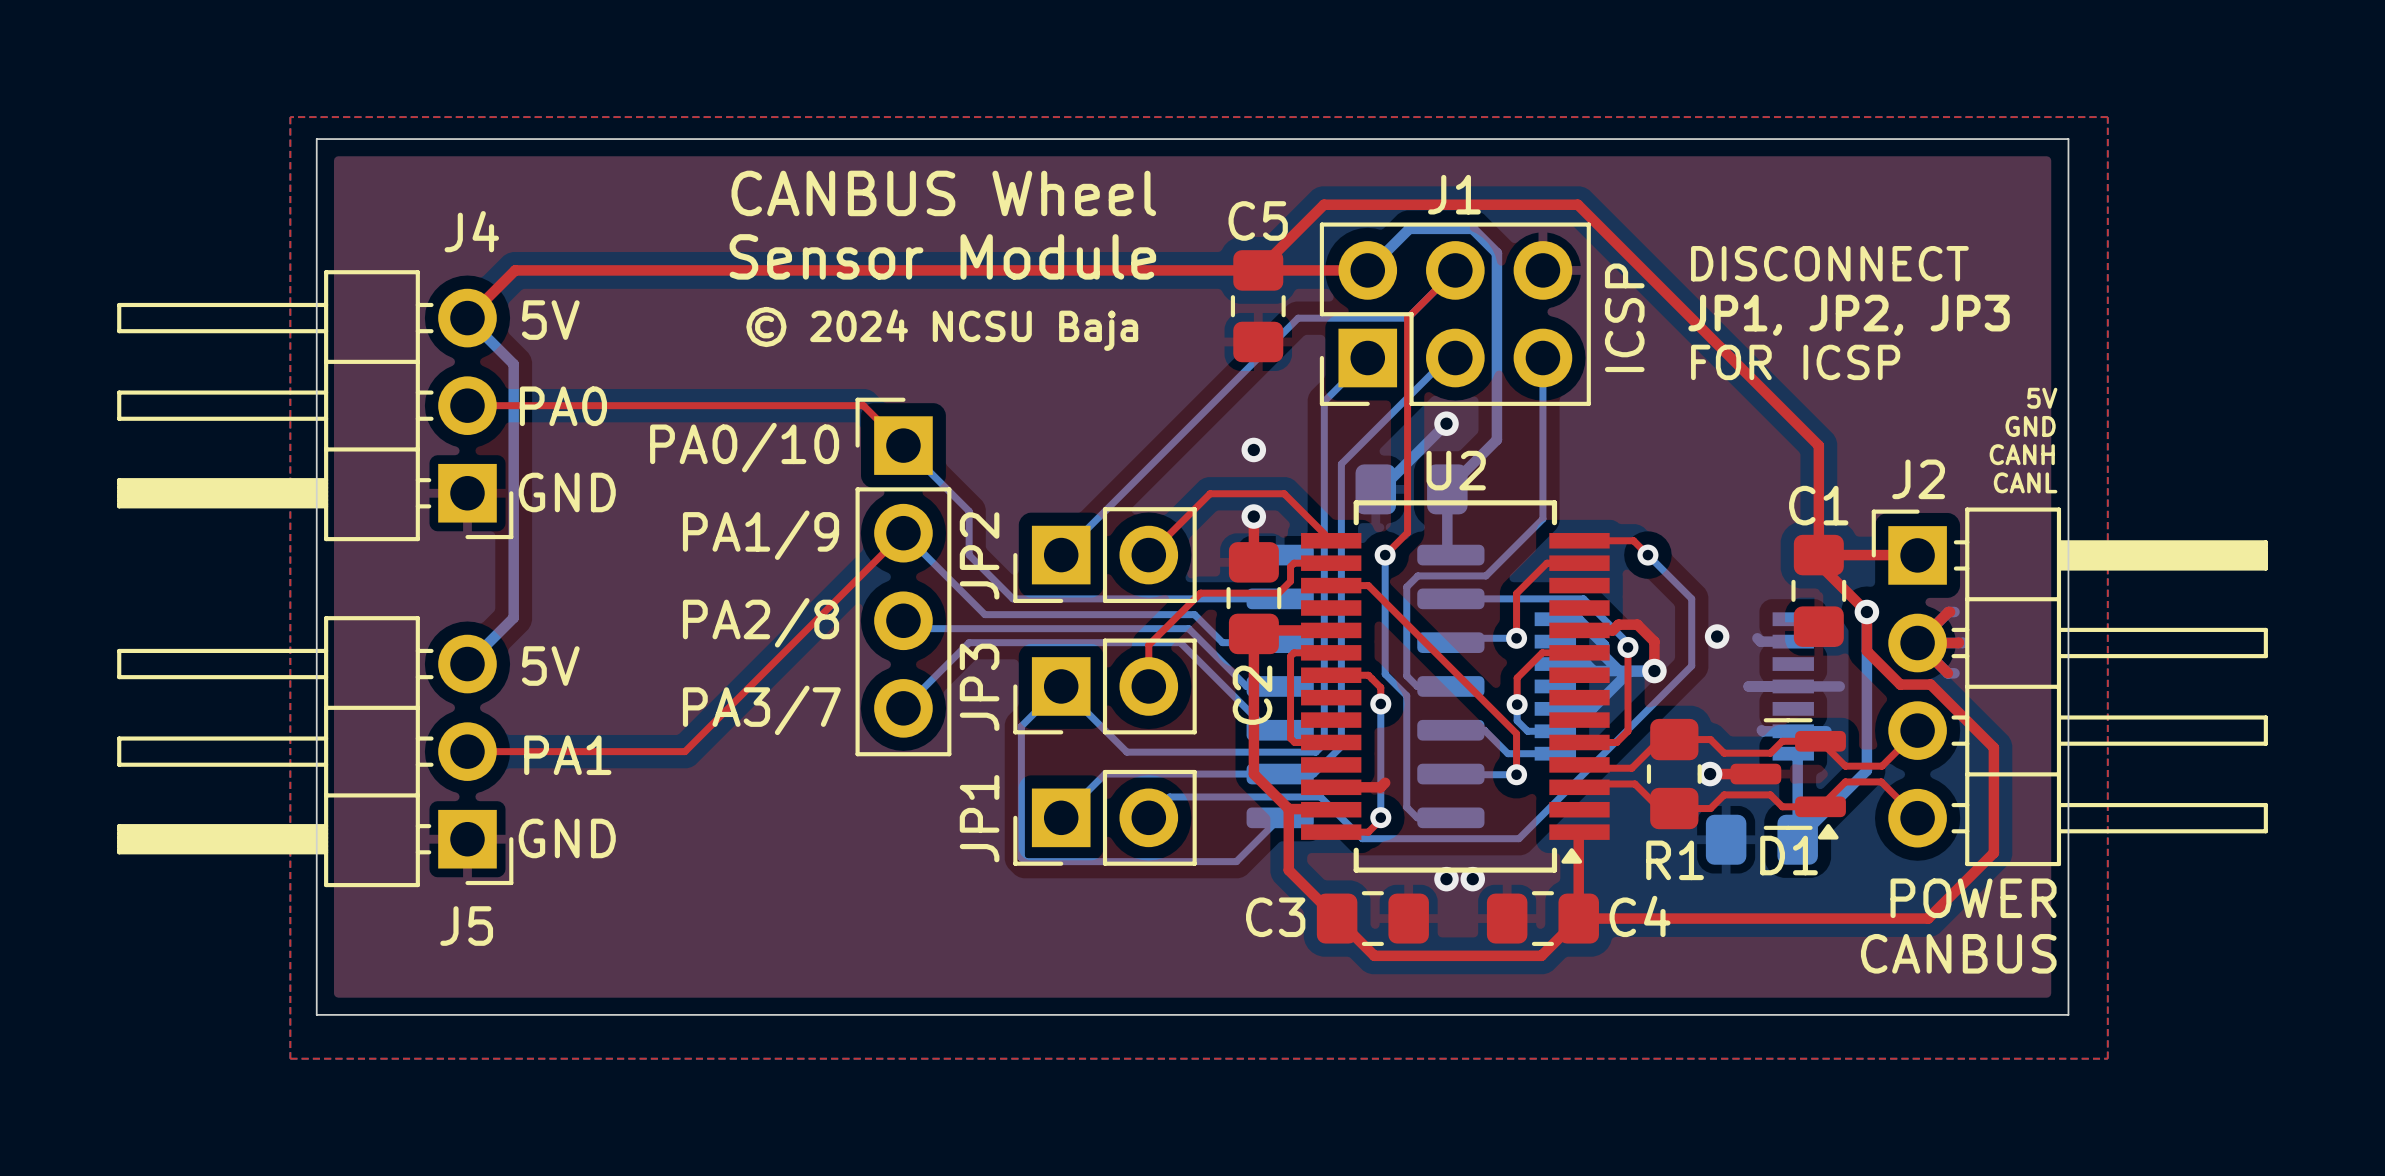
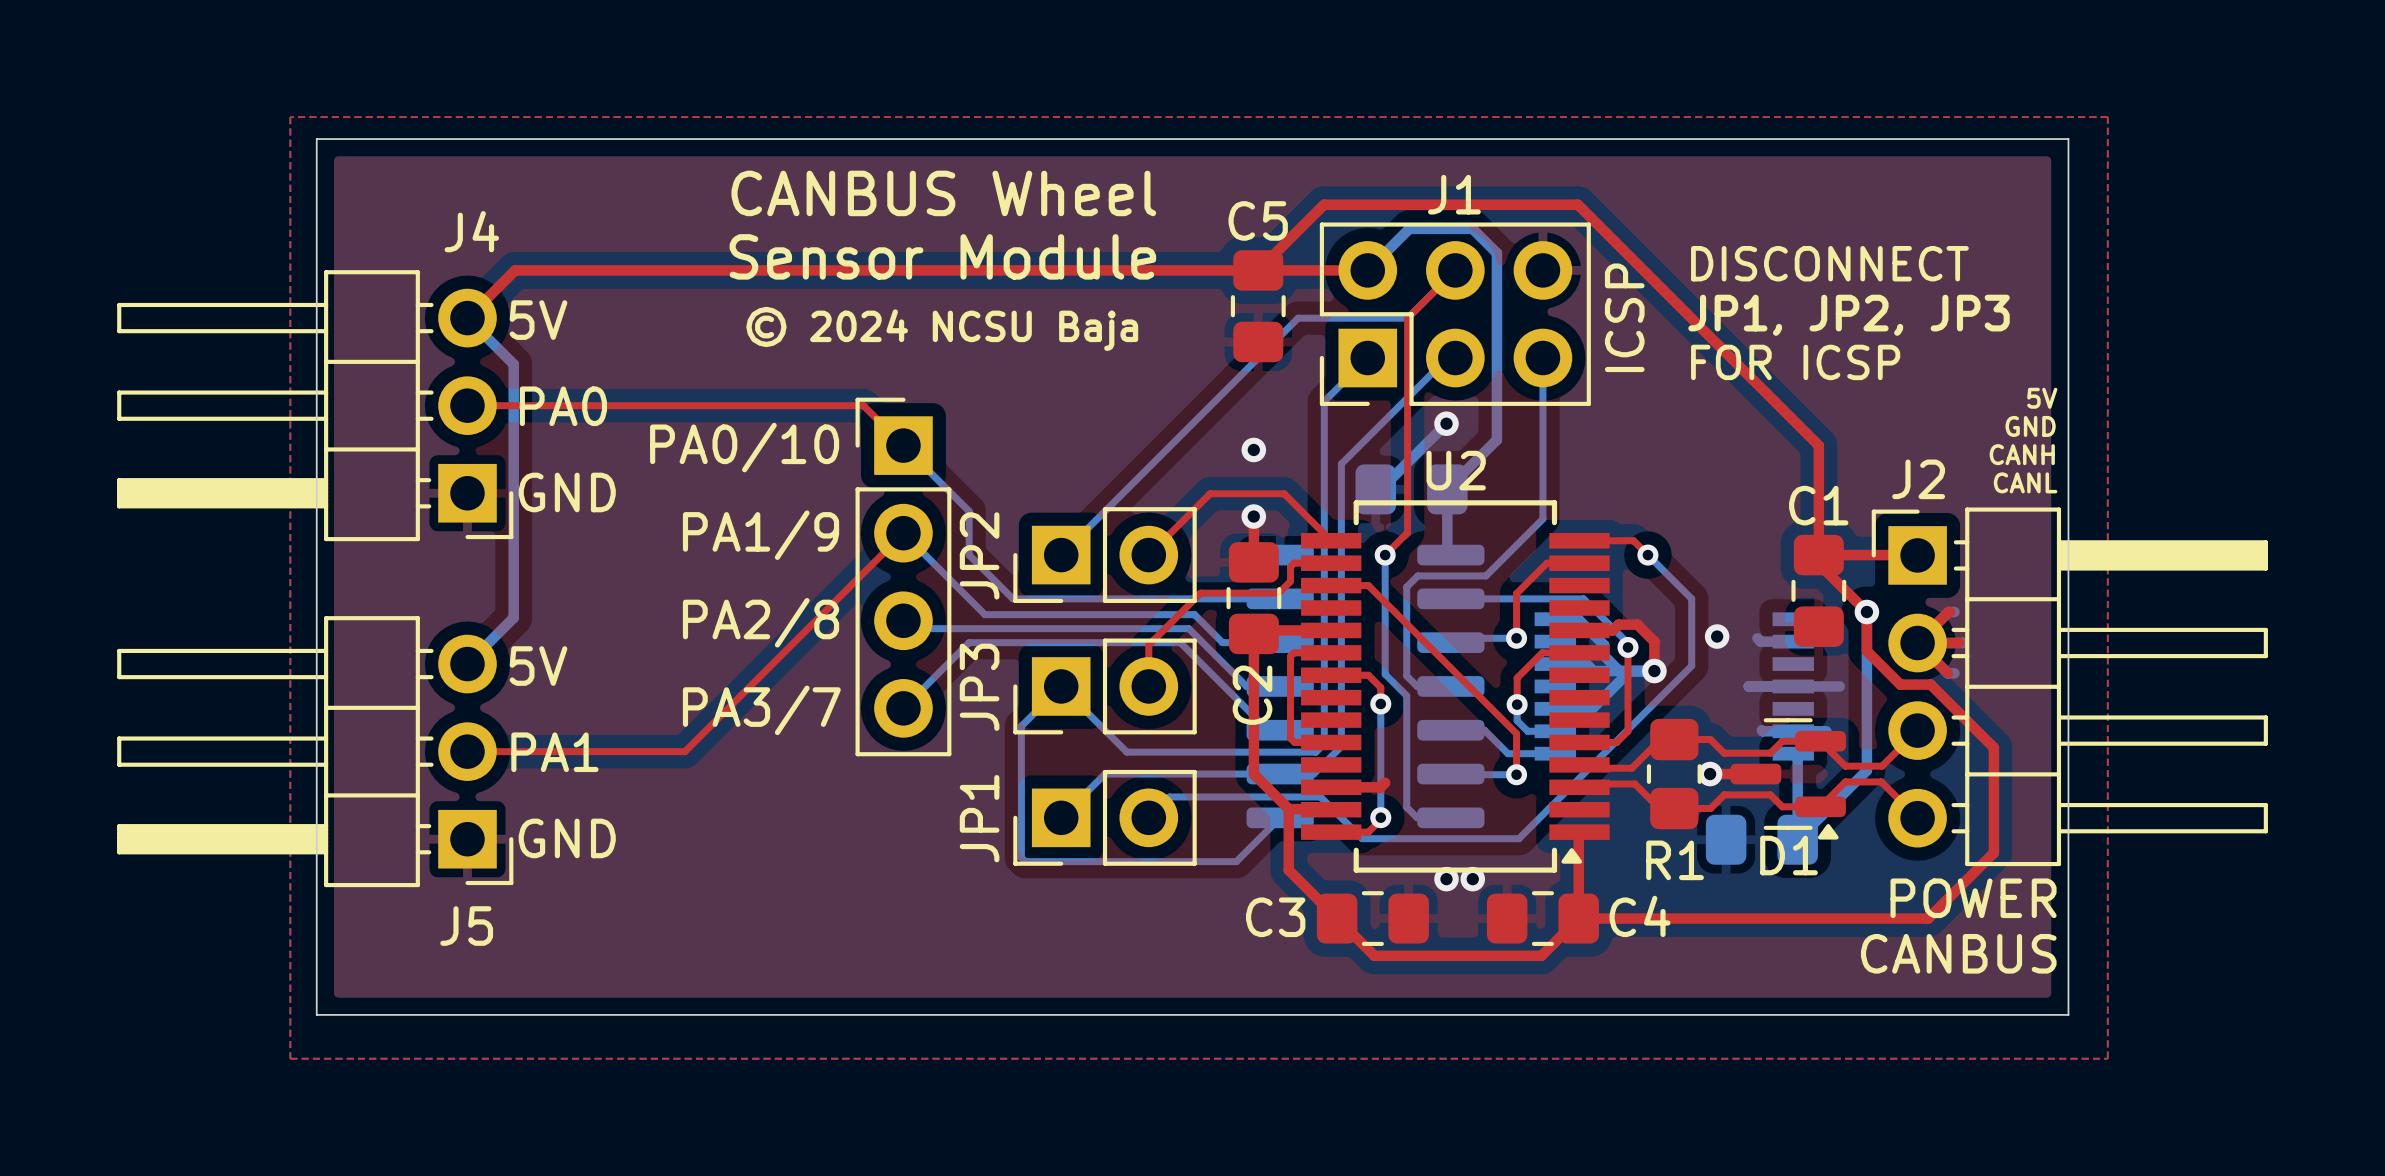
text position: 5V (550, 320) -> 5V (538, 320)
text position: 5V (550, 666) -> 5V (538, 666)
text position: PA1 (567, 755) -> PA1 (554, 752)

